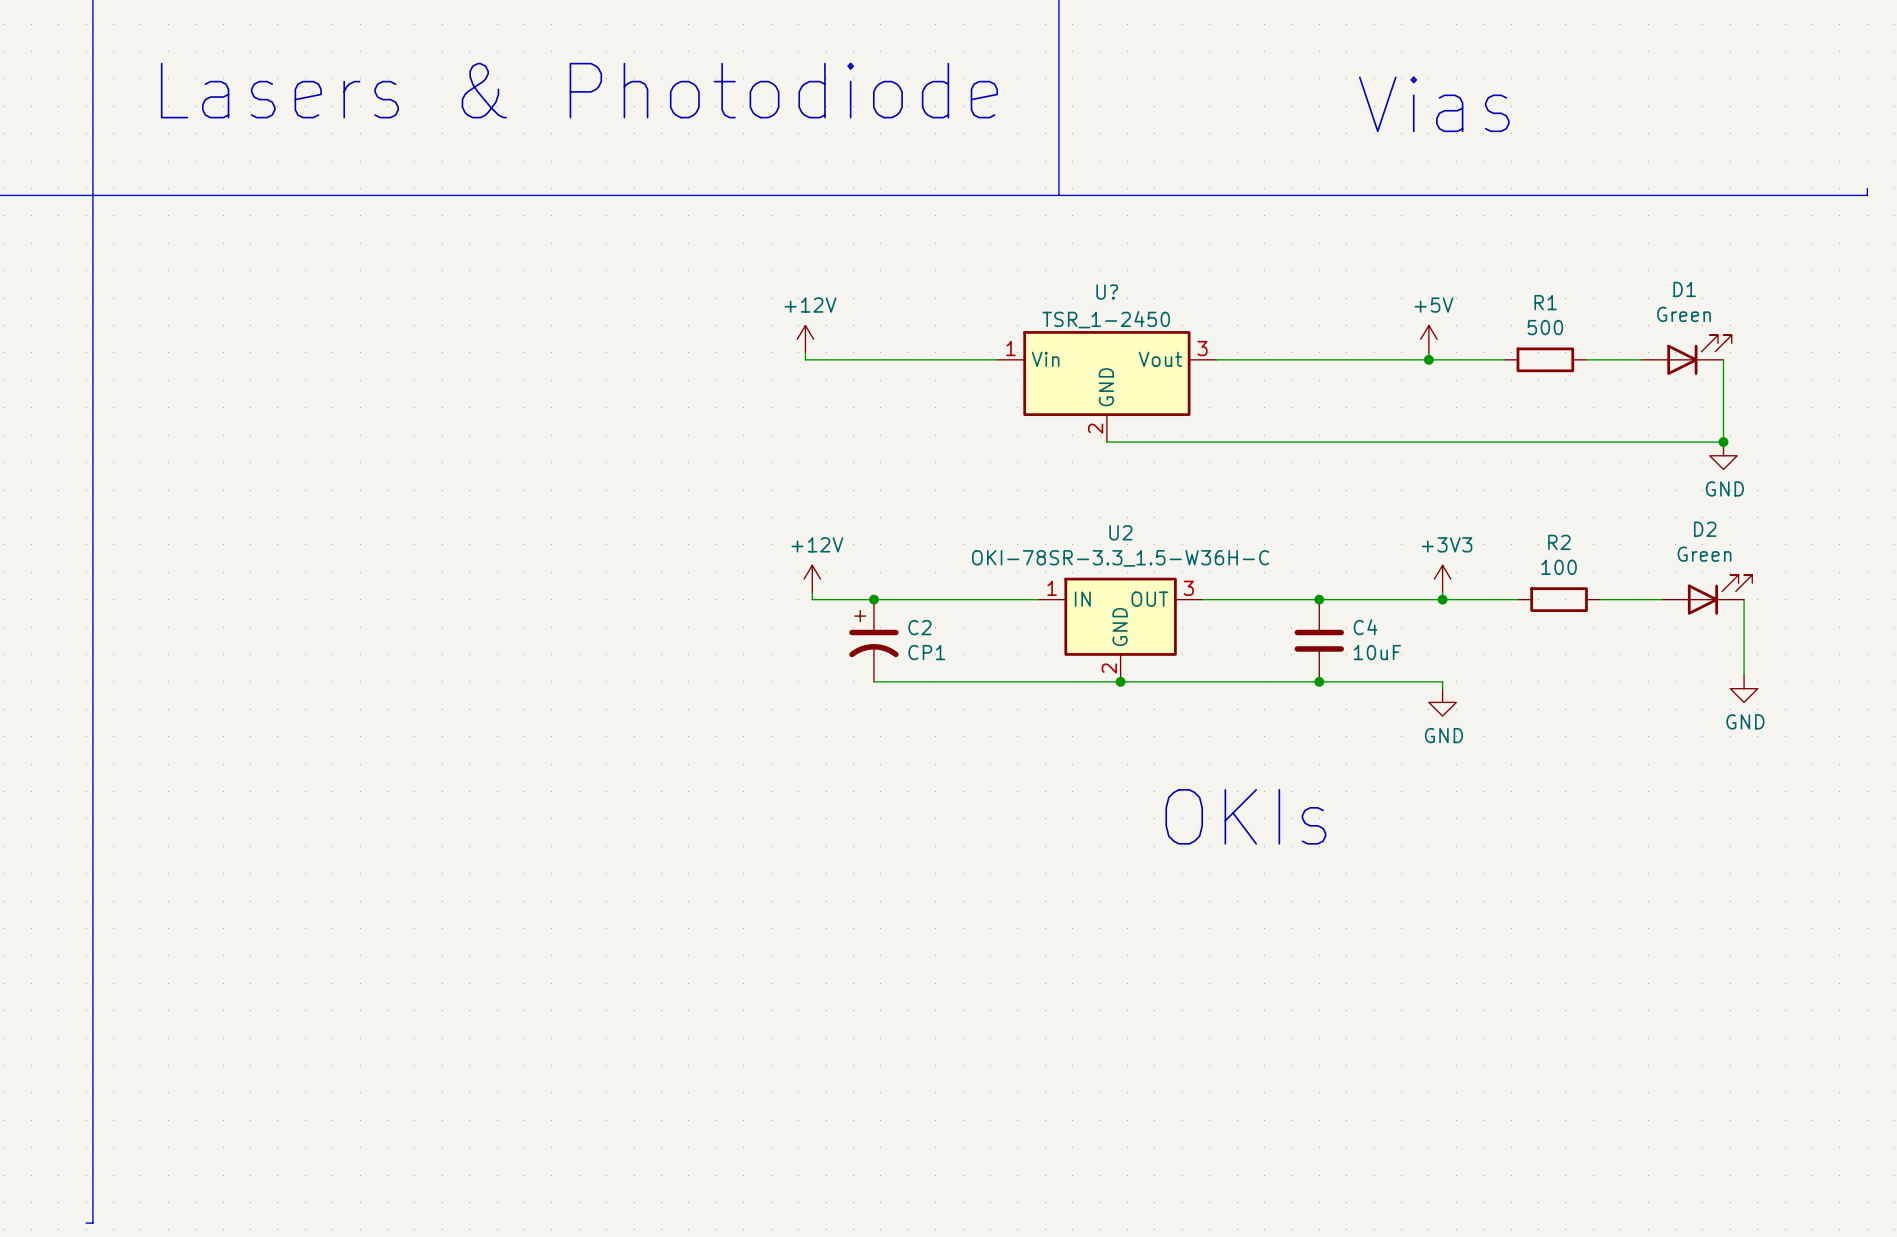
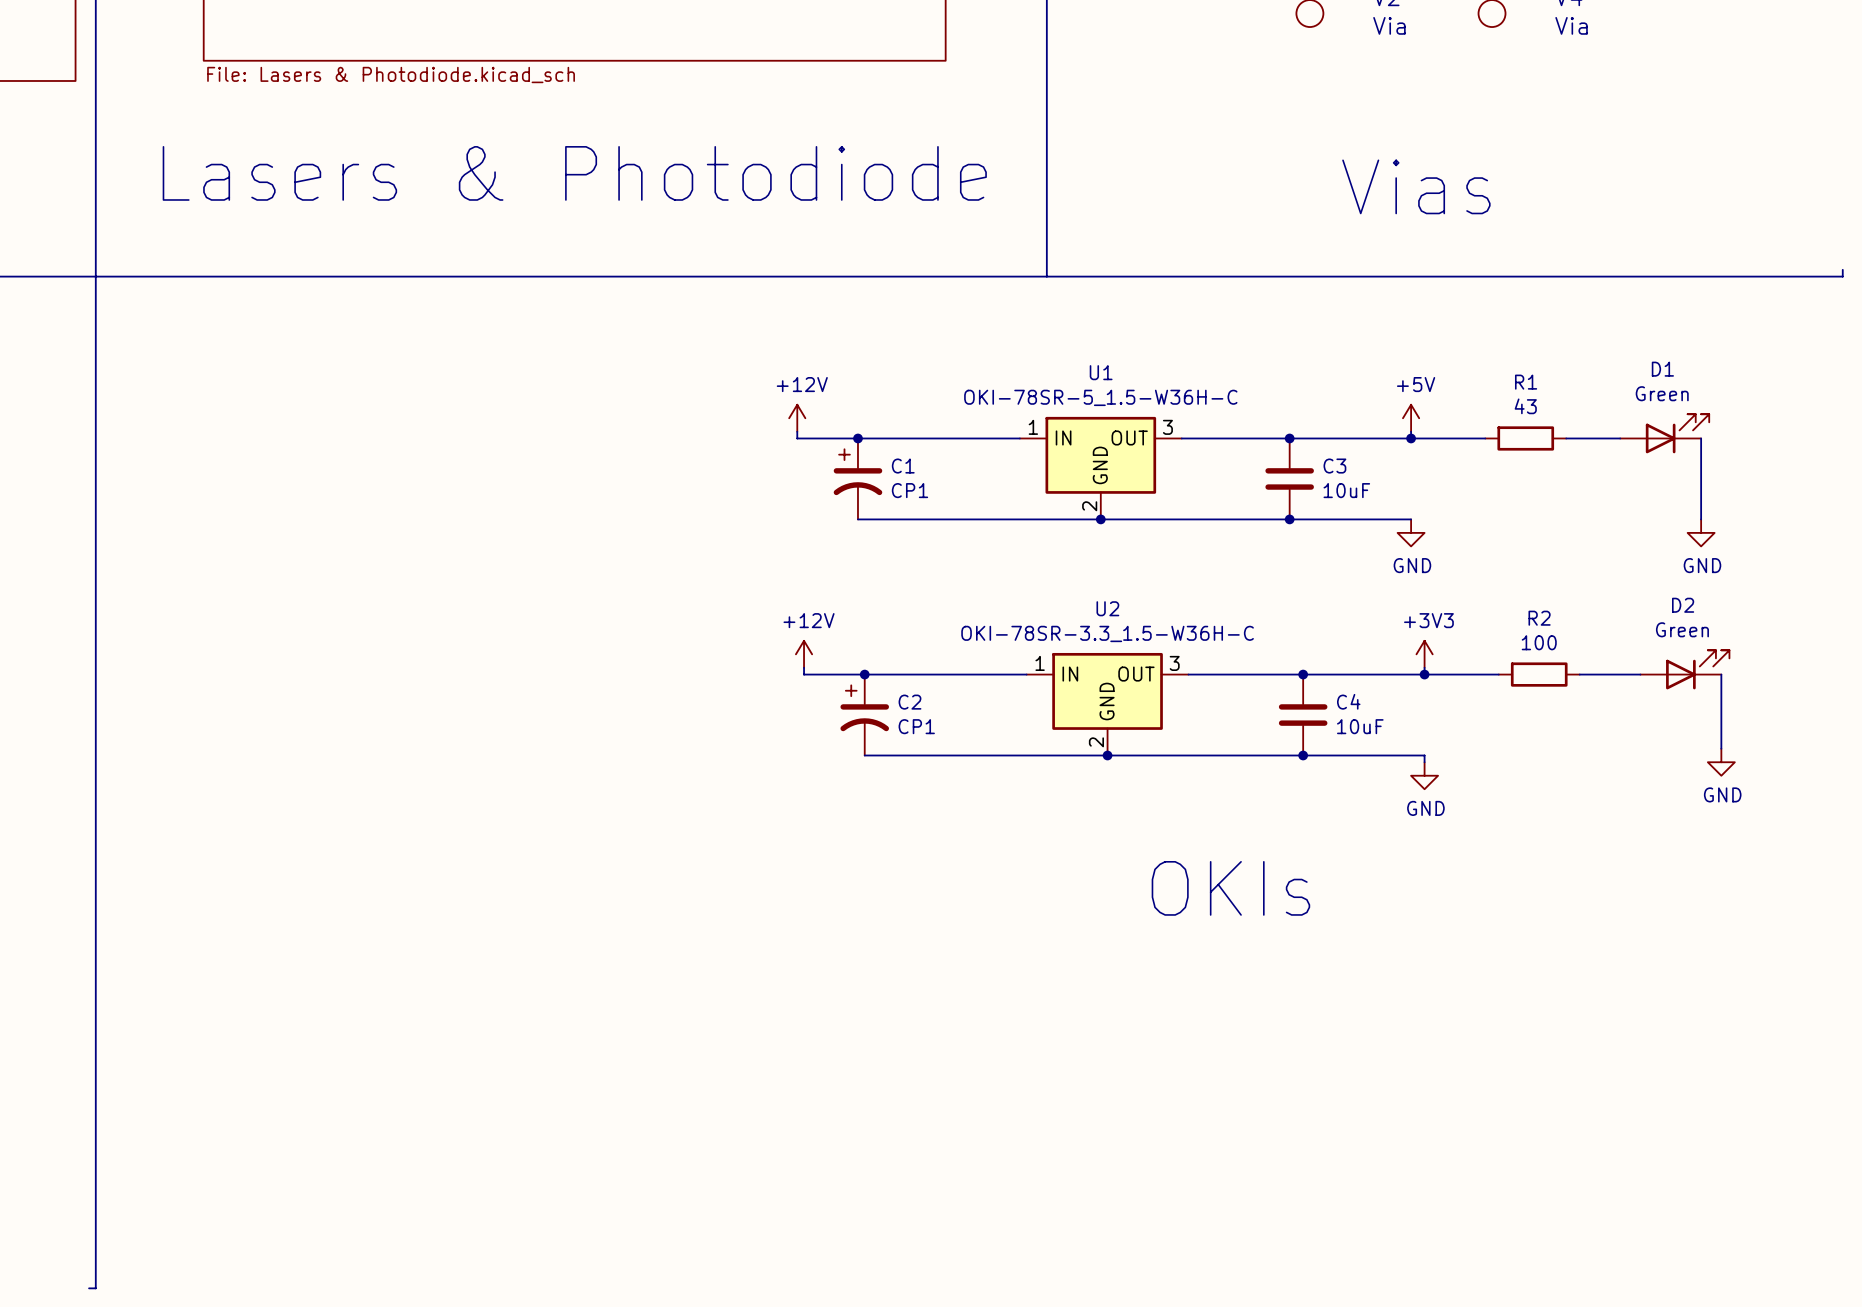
R1 value: 500 (1545, 327) -> 43 (1525, 406)
junction: none -> (857, 438)
junction: none -> (1289, 438)
U?: TSR_1-2450 (1106, 386) -> none
U1: none -> OKI-78SR-5_1.5-W36H-C (1100, 468)
C1: none -> CP1 (857, 478)
C3: none -> 10uF (1289, 478)
wire: none -> (857, 519) (1094, 519)
junction: none -> (1100, 519)
junction: none -> (1289, 519)
wire: (1428, 442) (1723, 442) -> none
junction: (1723, 442) -> none
power symbol: none -> GND (1411, 532)

